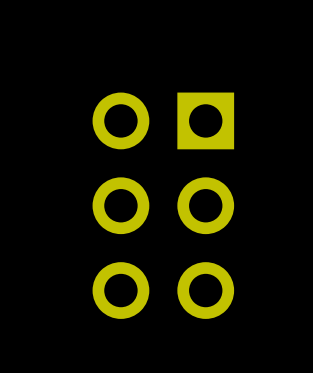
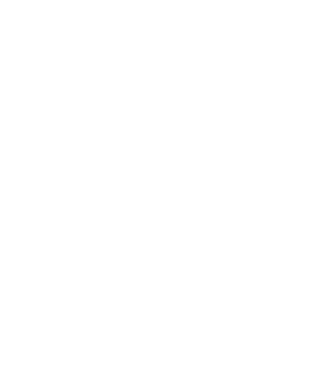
part: (163, 205) -> none

